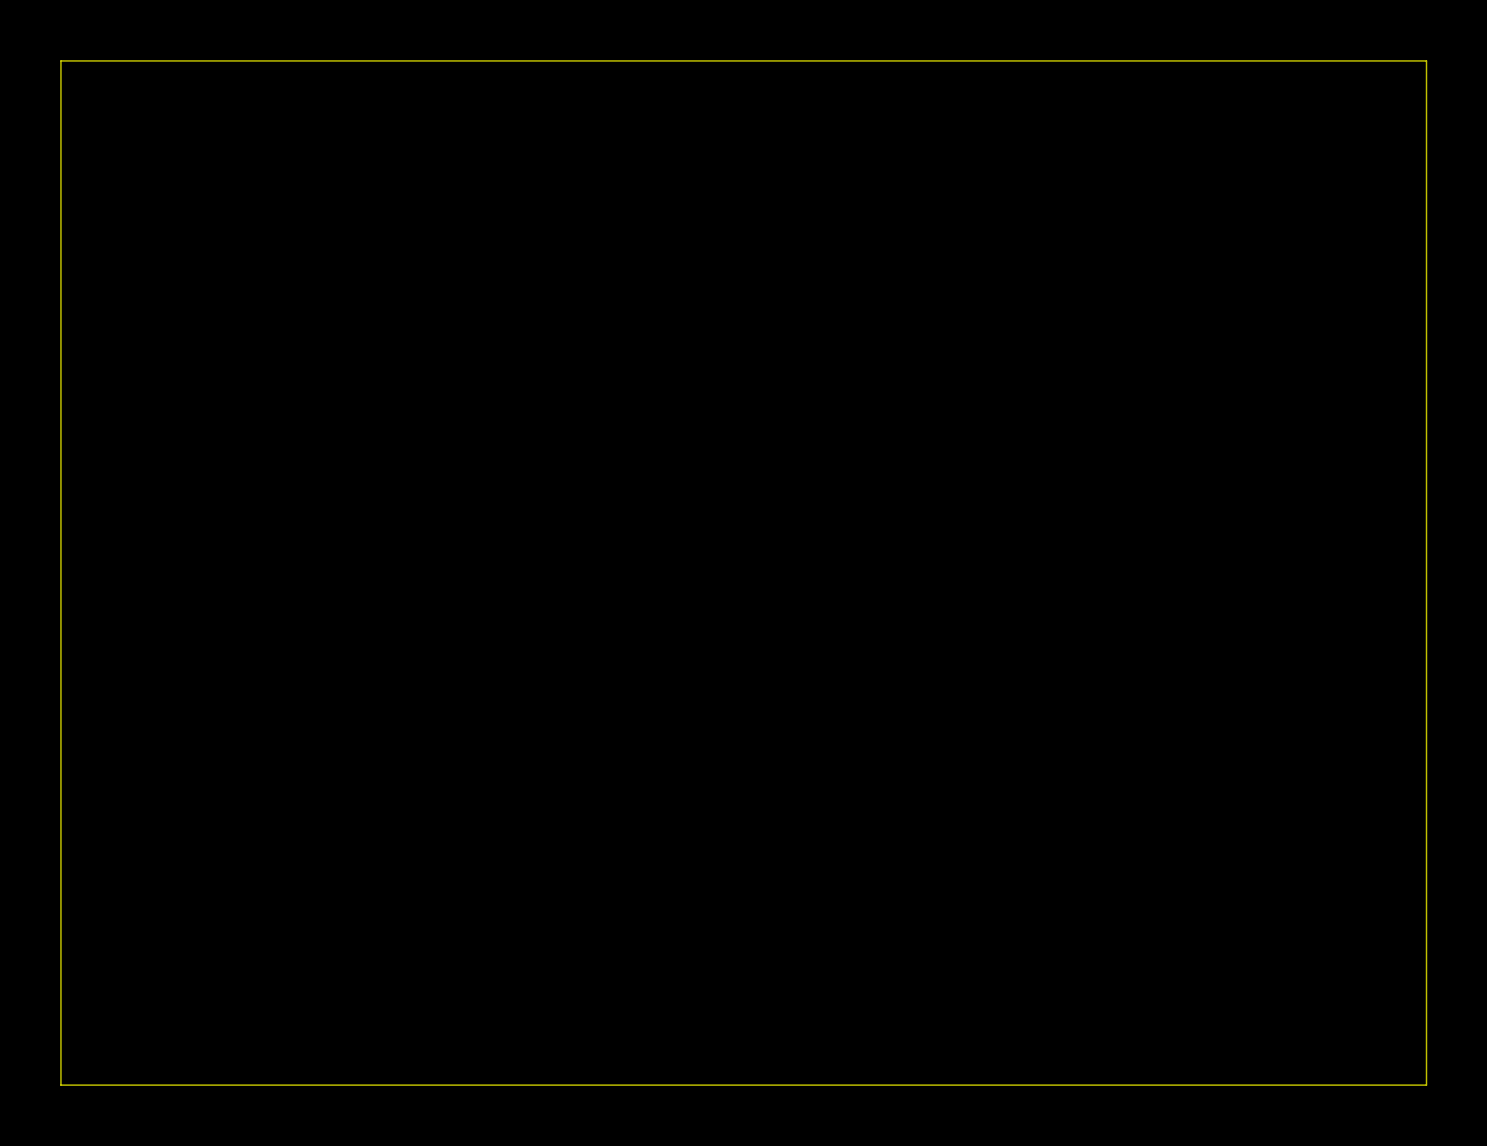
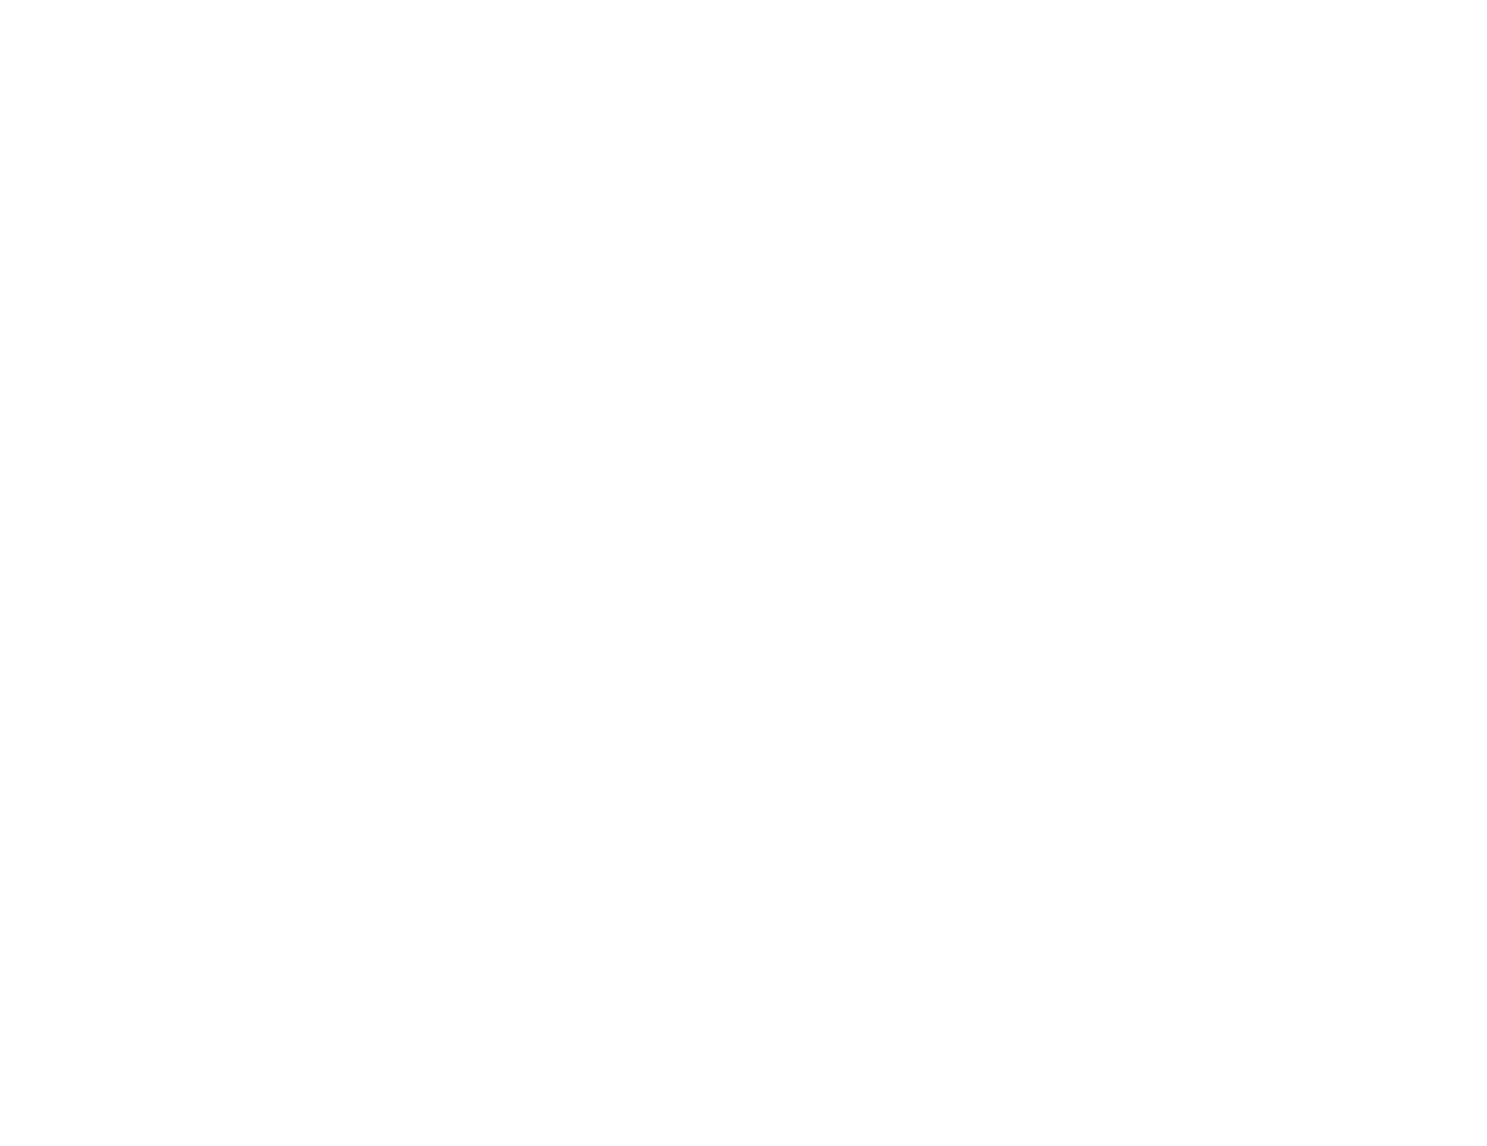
board edge: (60, 60) (1426, 60) (1426, 1085) (60, 1085) (60, 60) -> none

